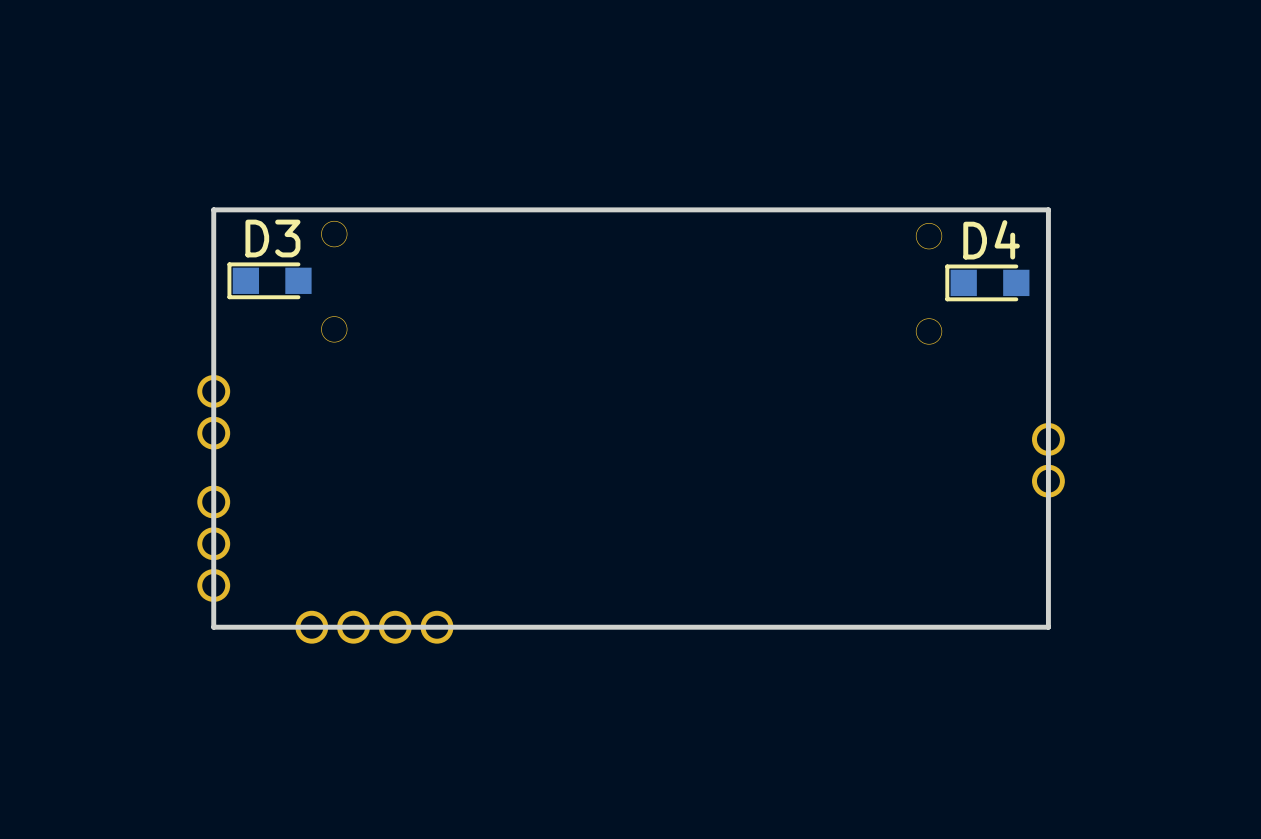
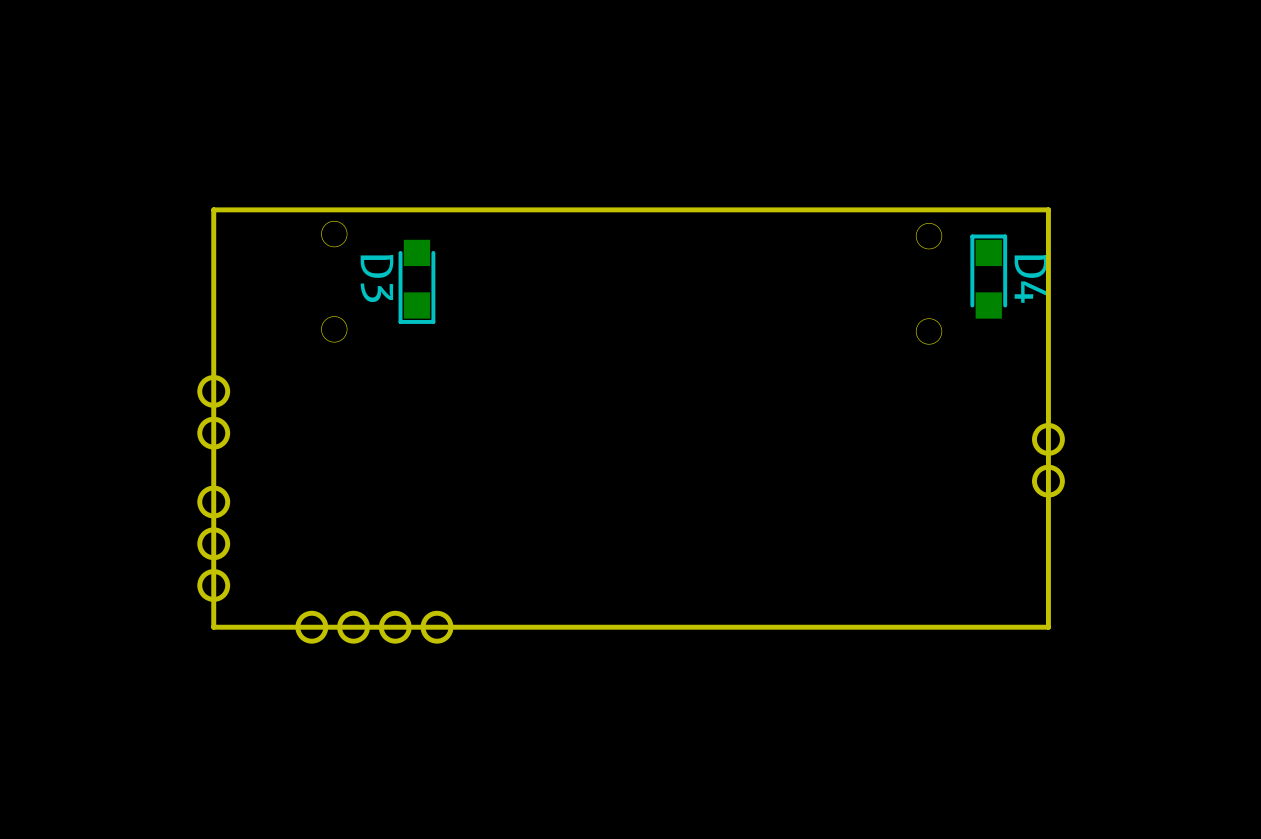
D3 rotation: 0° (269, 280) -> 90° counterclockwise (416, 281)
D3 position: (269, 280) -> (416, 281)
D4 rotation: 0° (987, 282) -> 90° clockwise (988, 276)

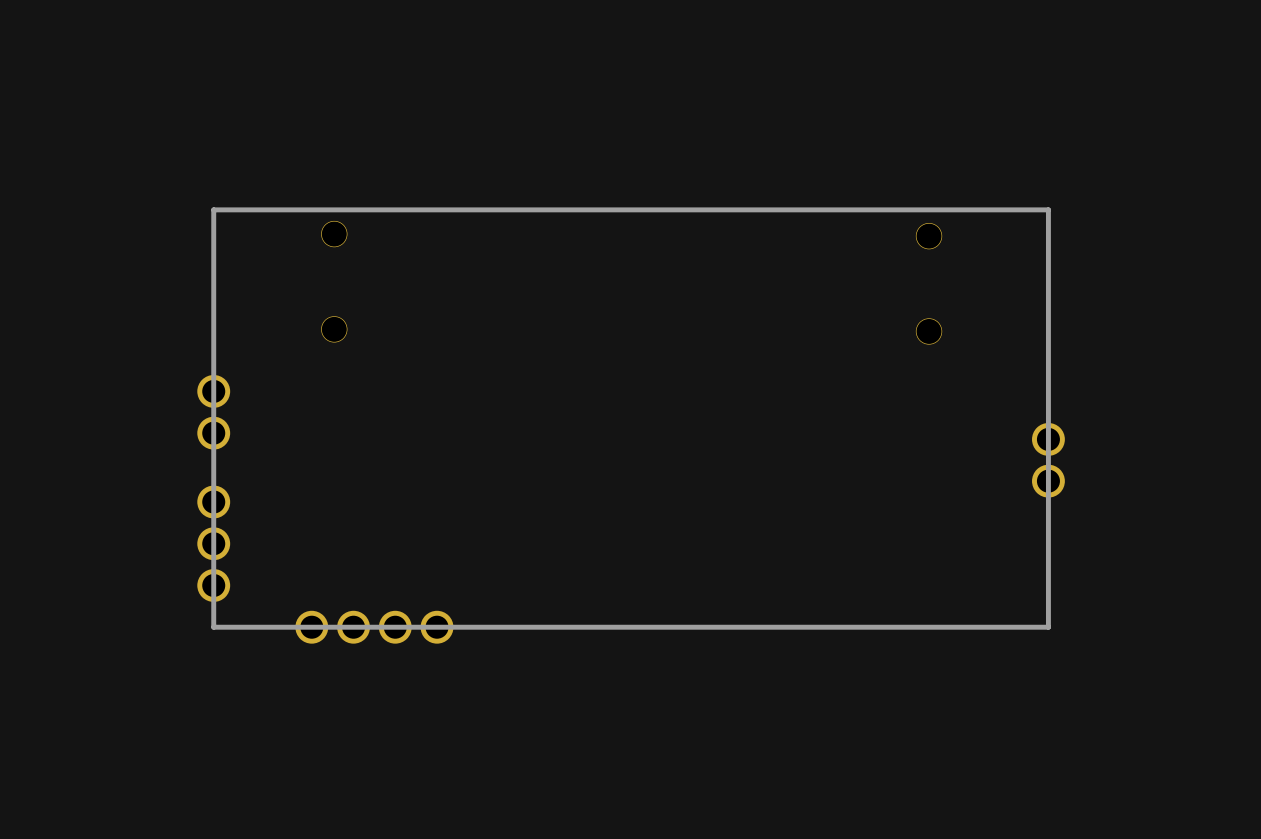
D4: (988, 276) -> none
D3: (416, 281) -> none

